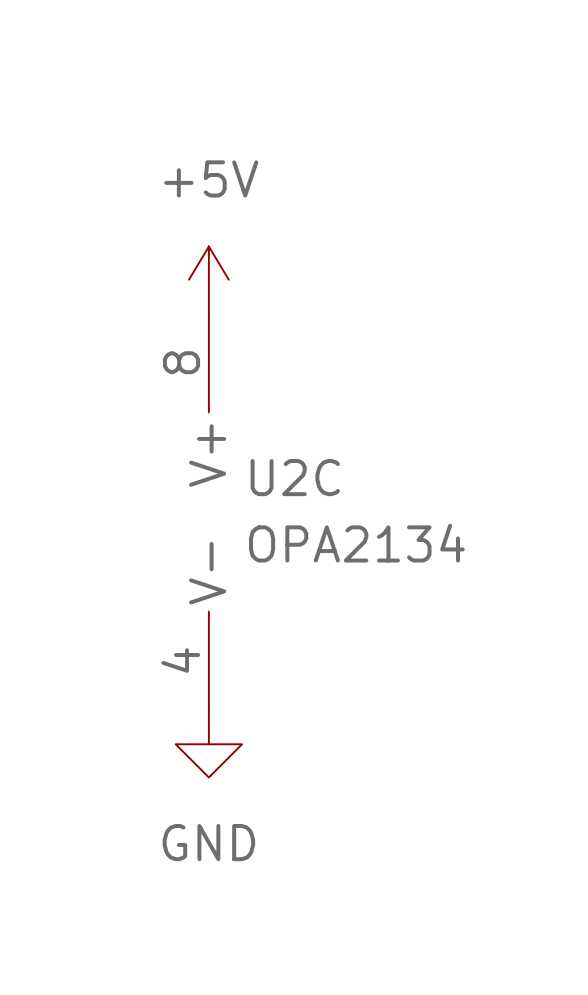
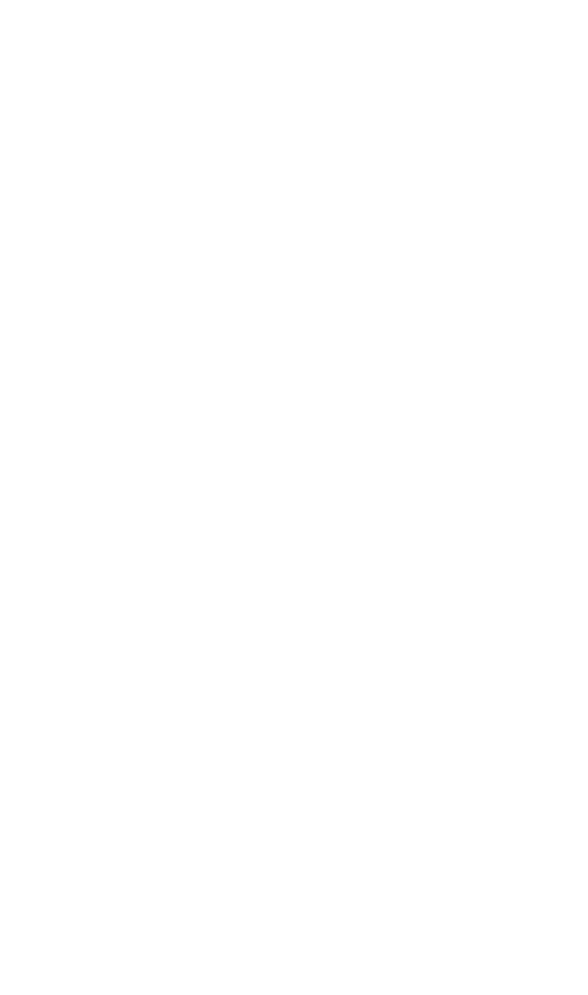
power symbol: +5V (208, 279) -> none
U2C: OPA2134 (208, 512) -> none
power symbol: GND (208, 744) -> none

